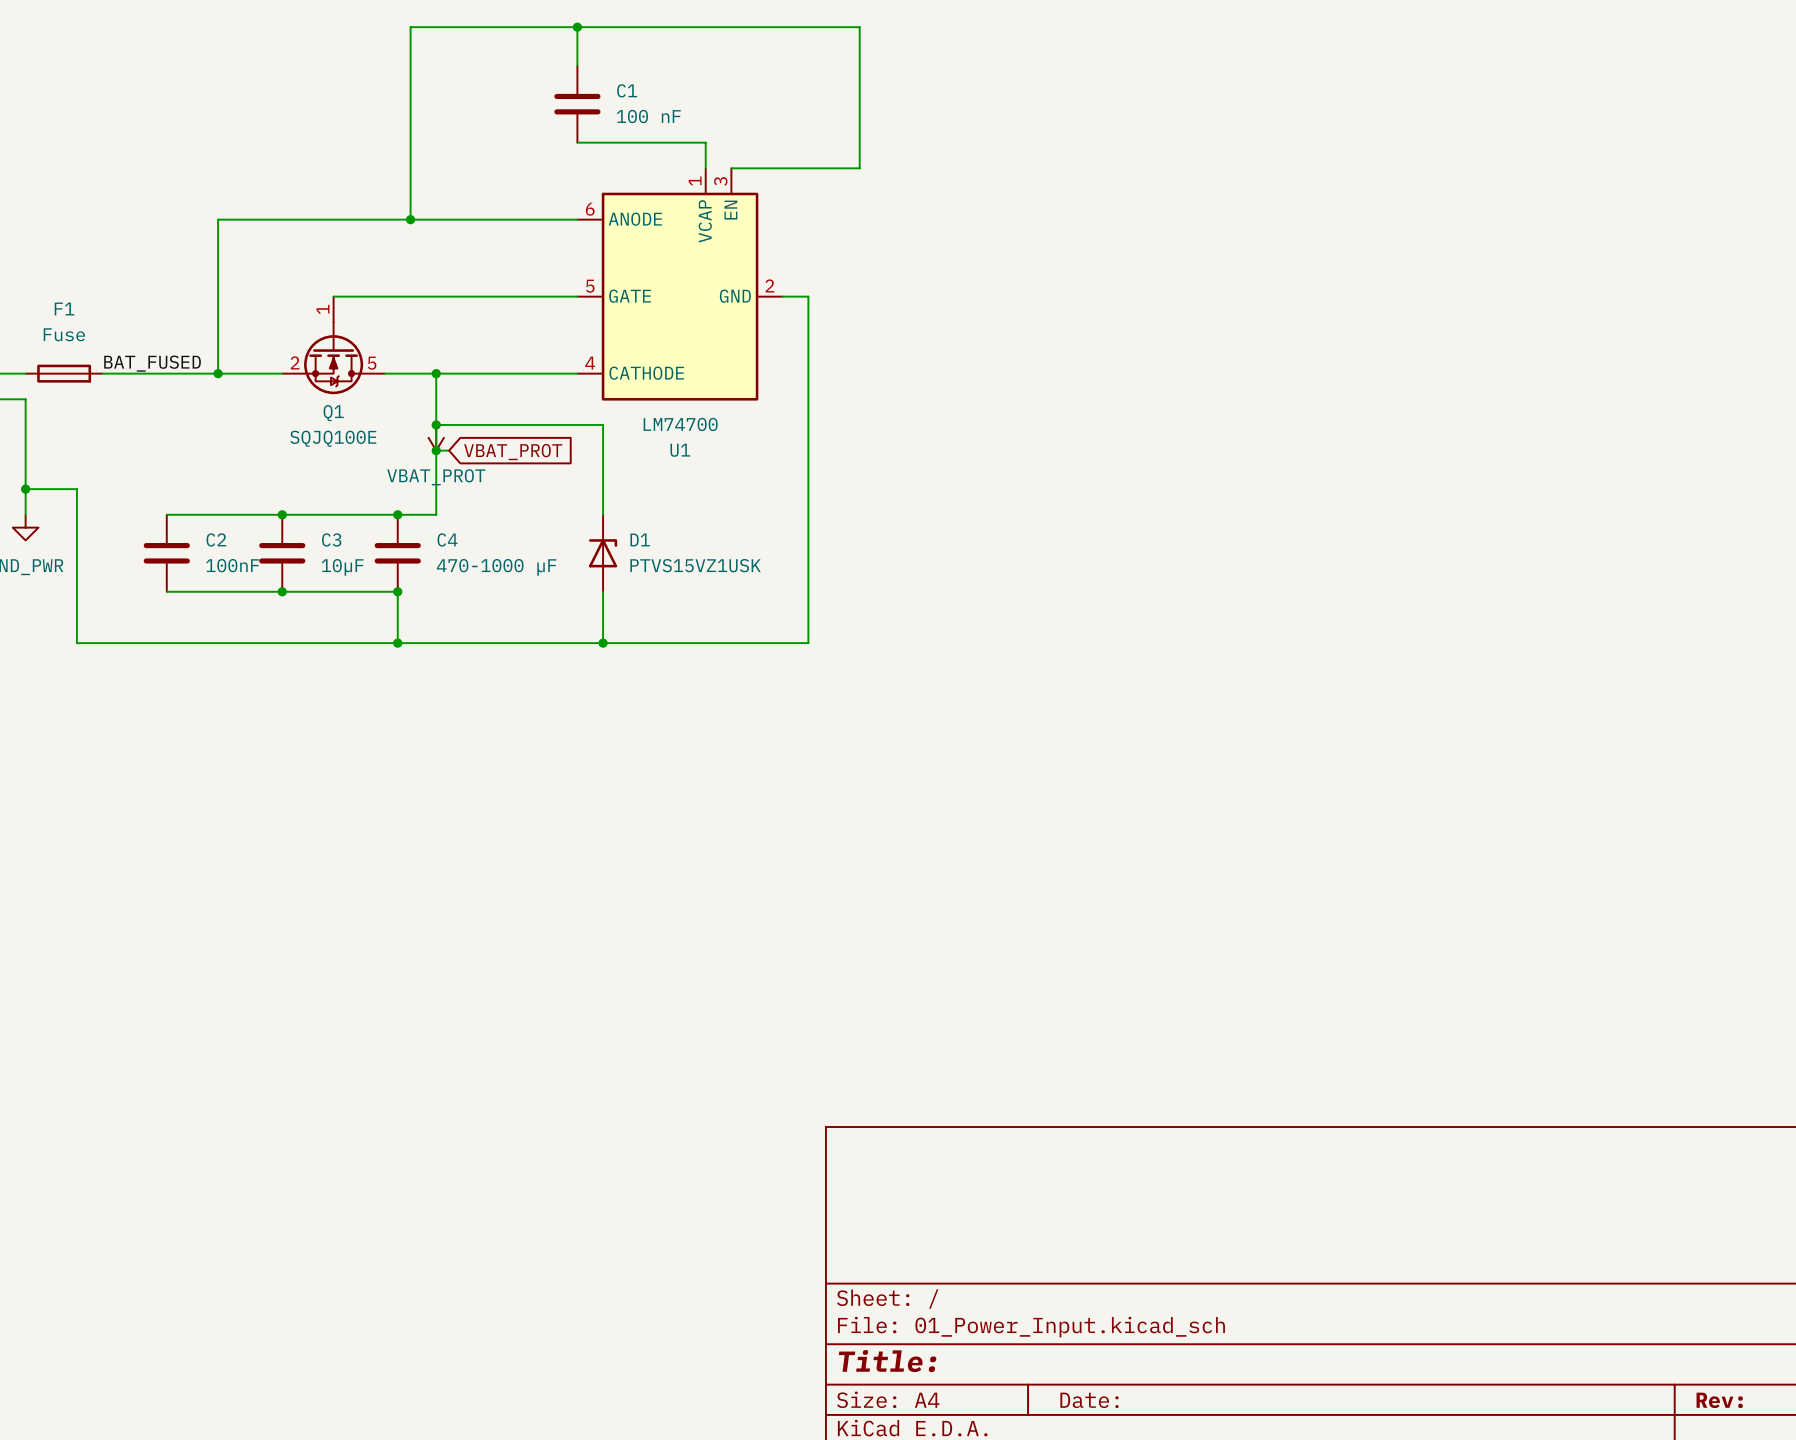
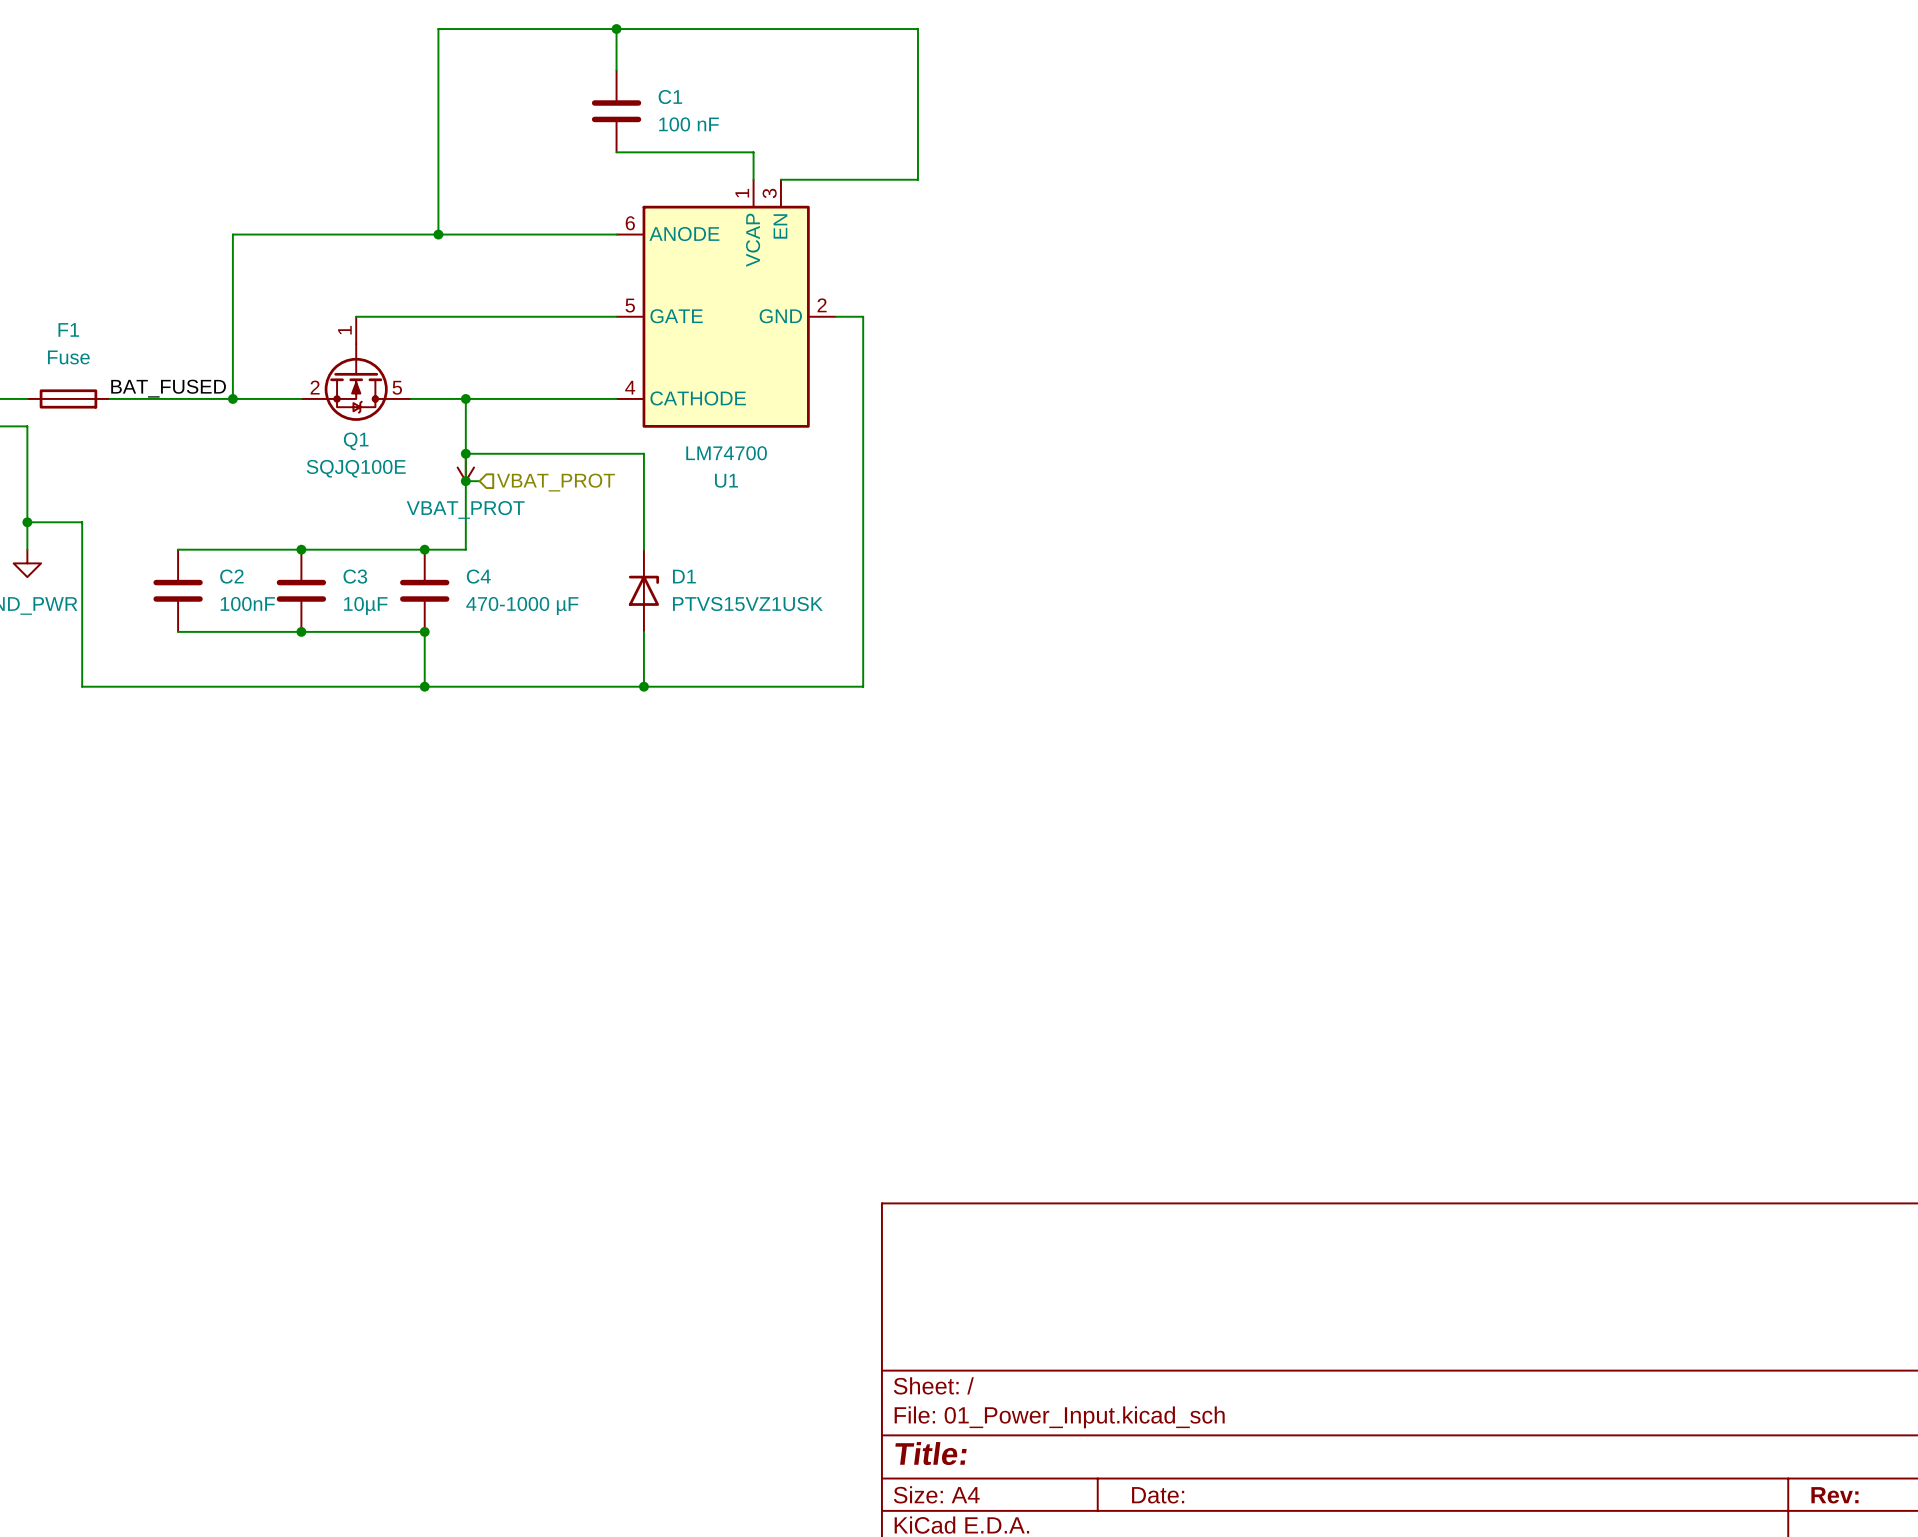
hierarchical label: none -> VBAT_PROT (555, 482)
global label: VBAT_PROT (513, 452) -> none

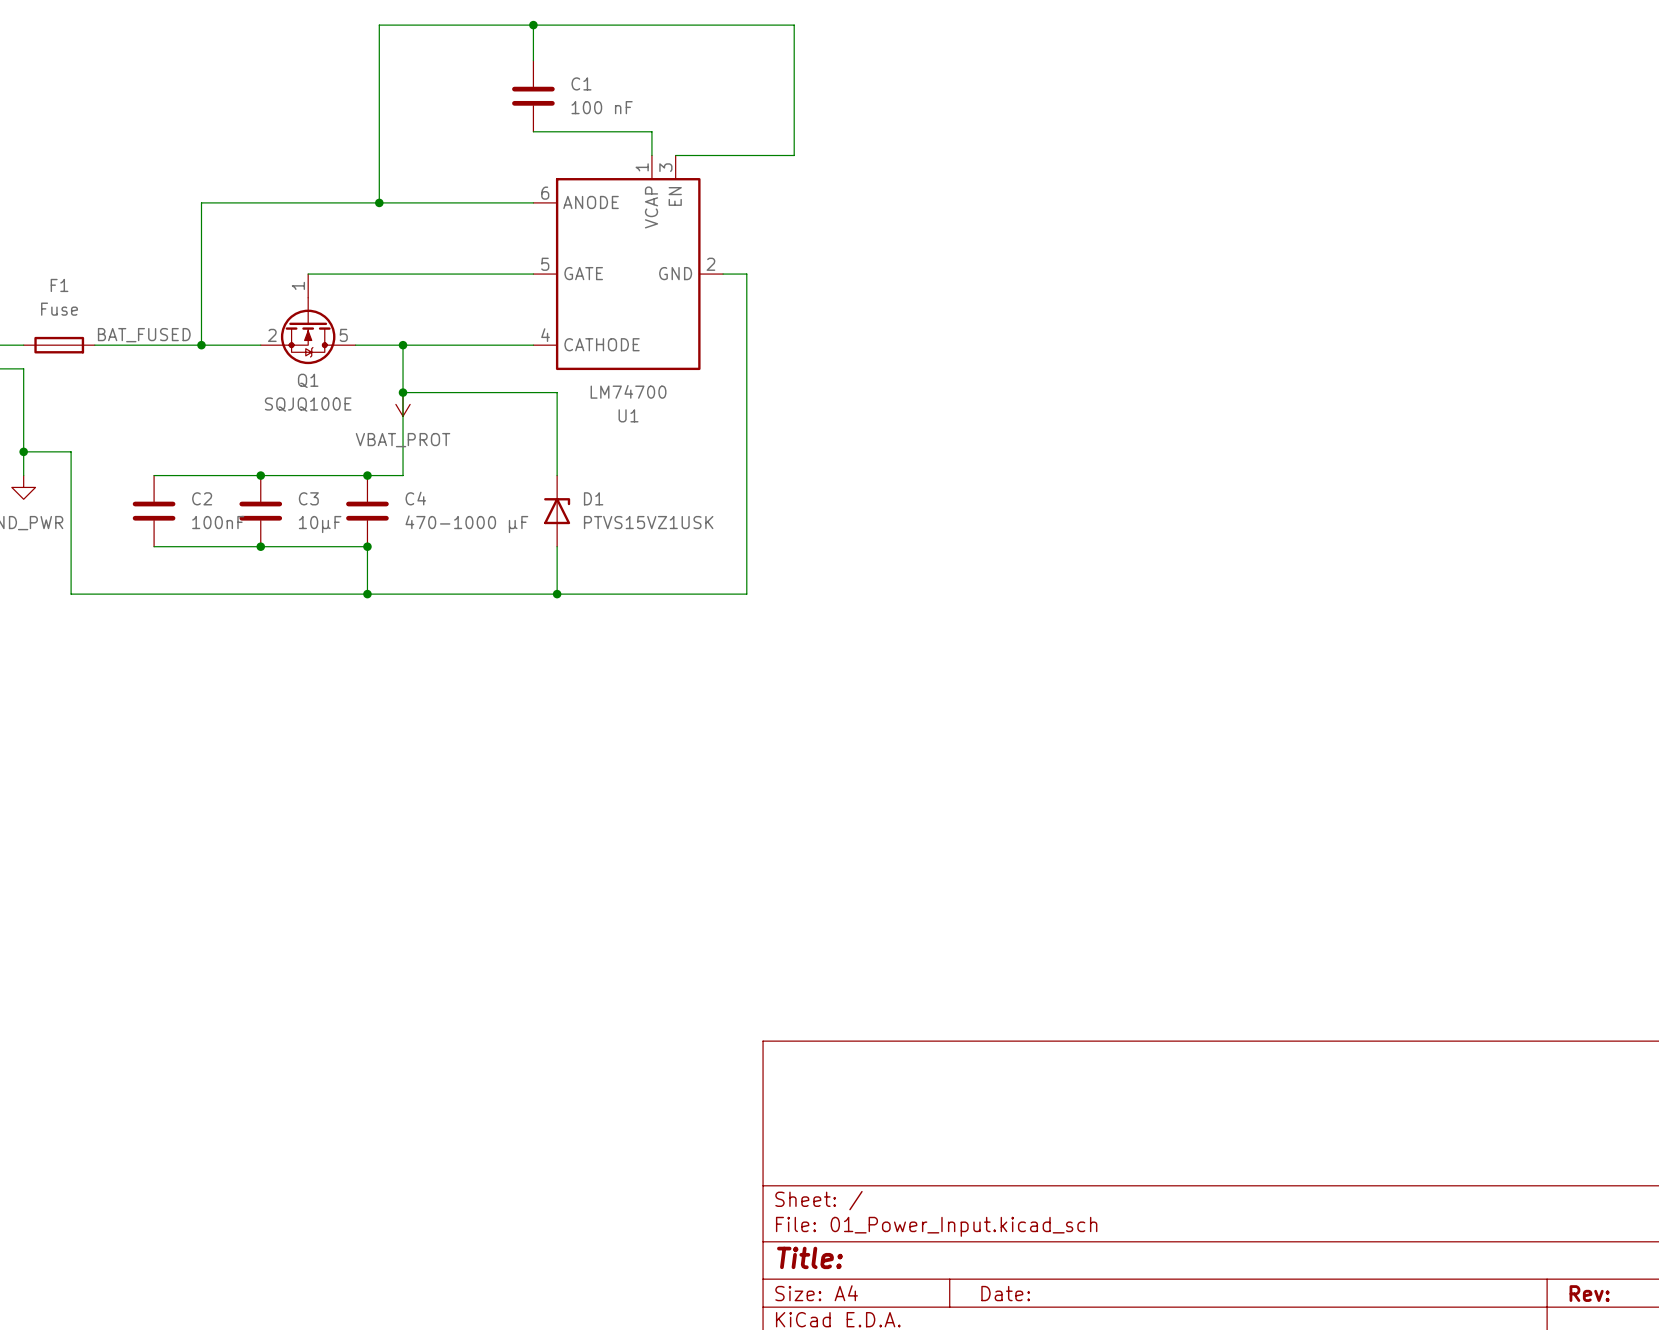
wire: (465, 481) (479, 481) -> none
junction: (465, 481) -> none
hierarchical label: VBAT_PROT (555, 482) -> none

